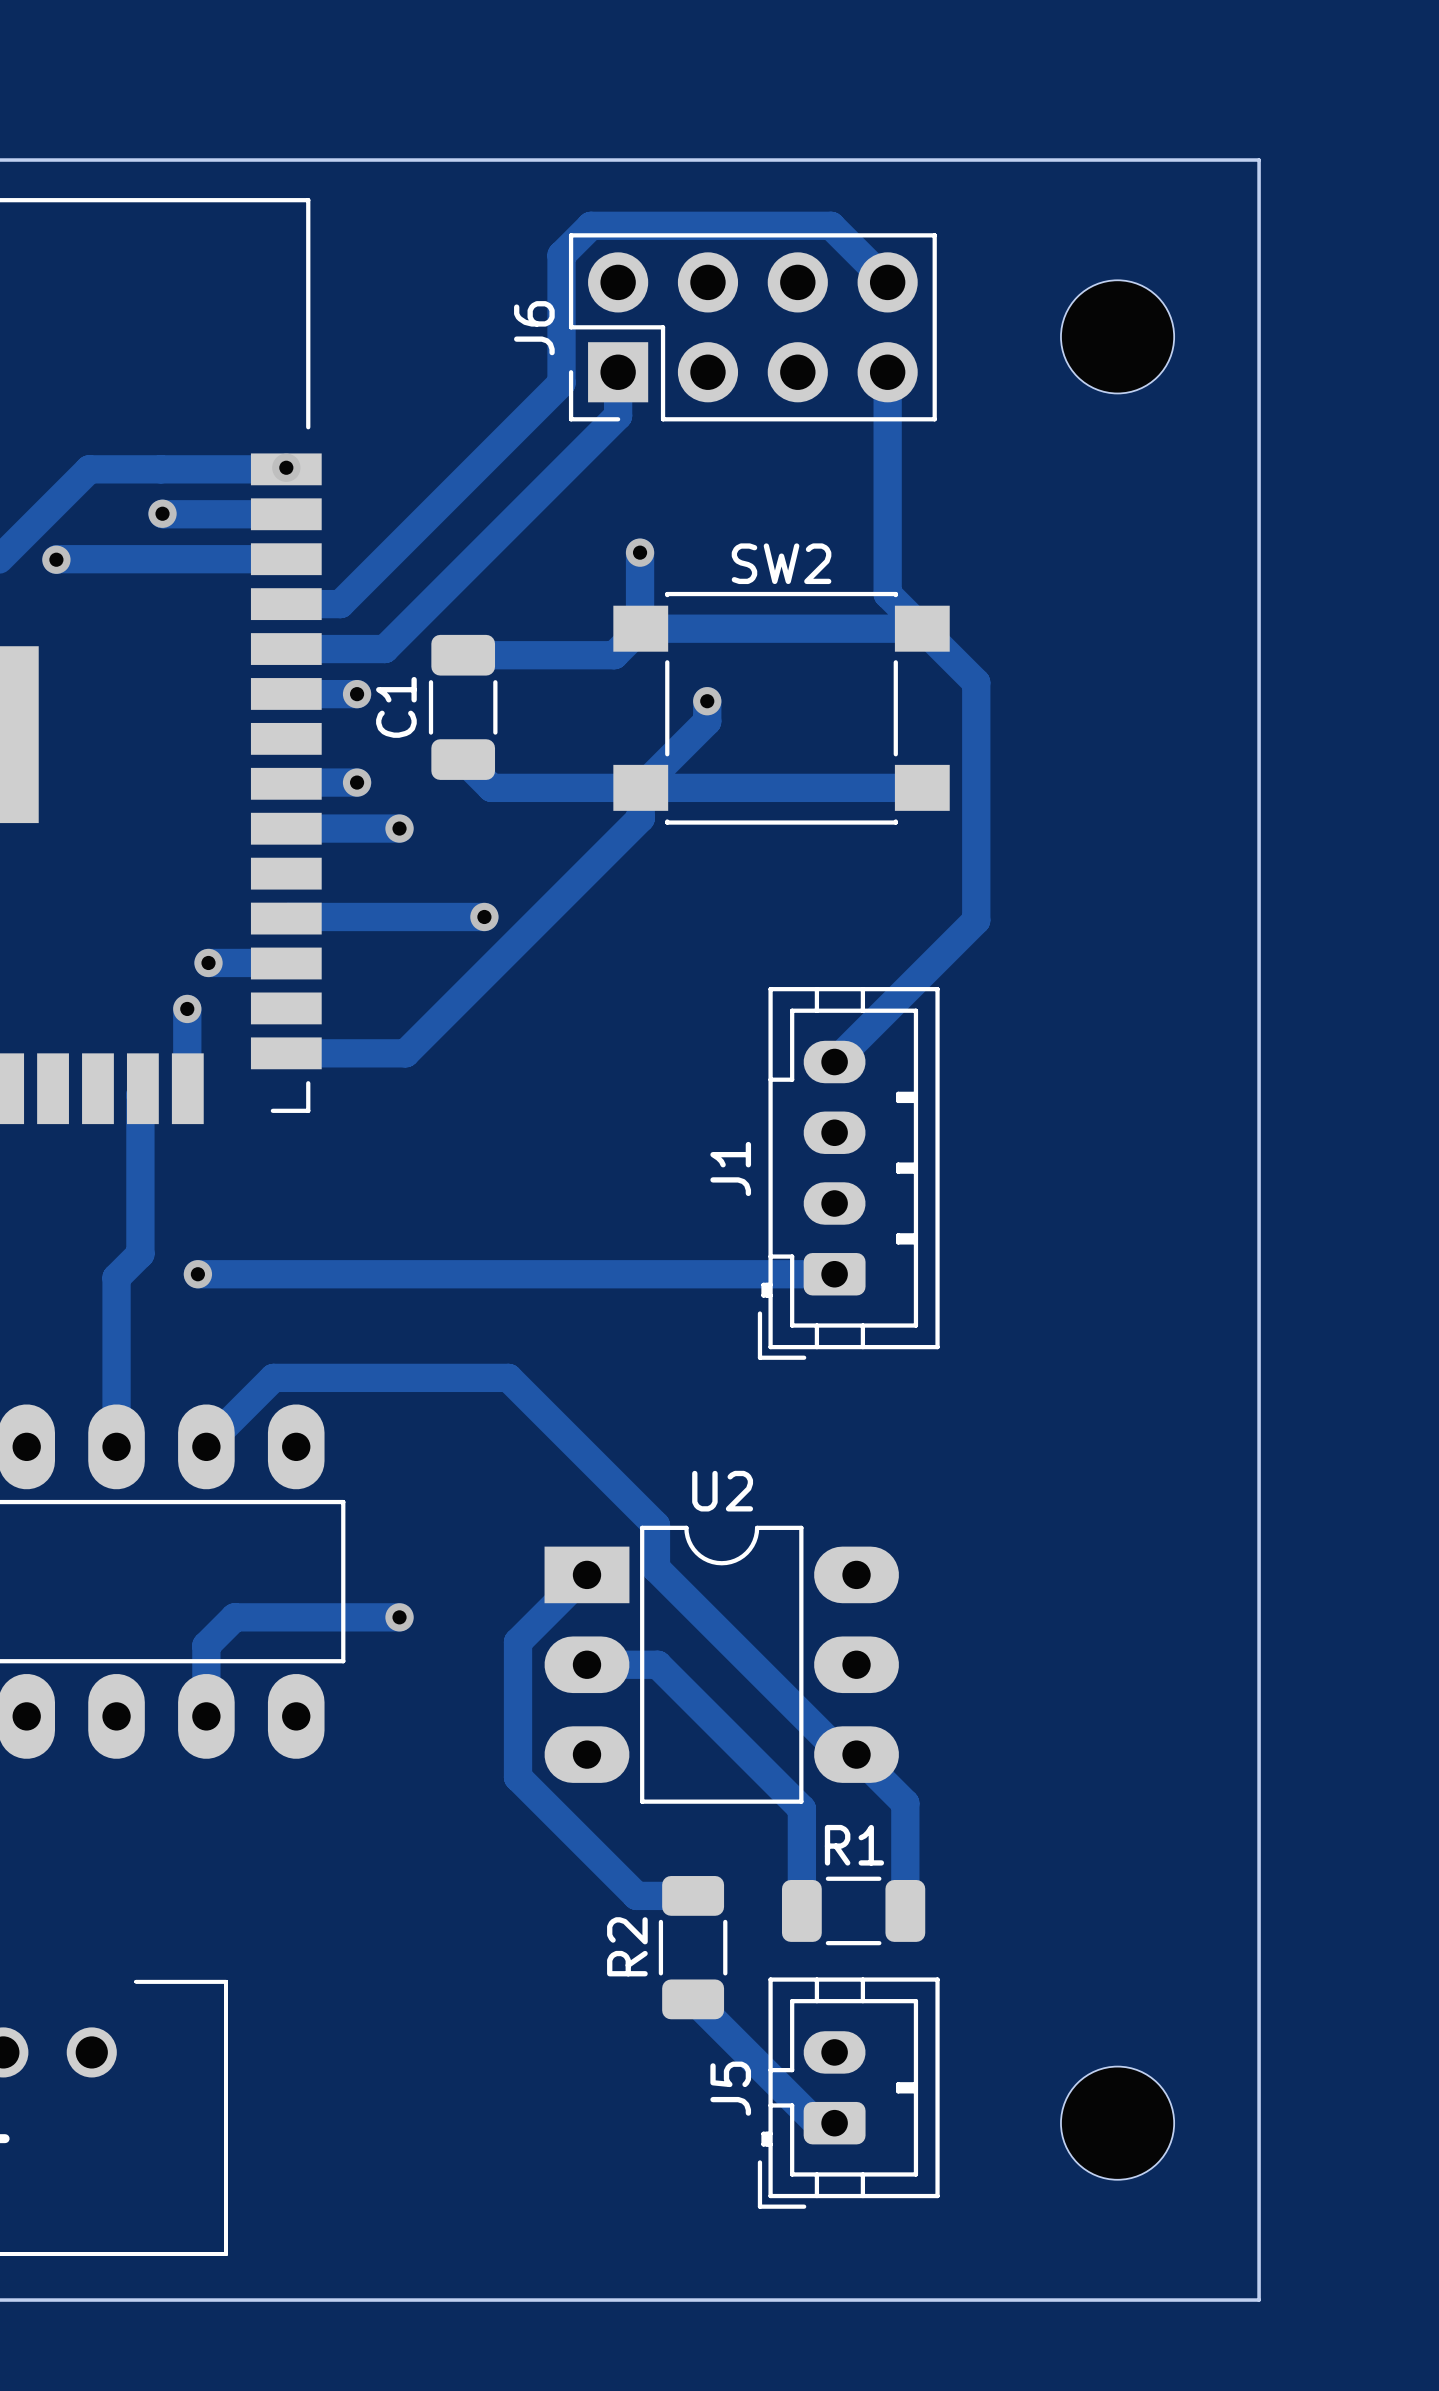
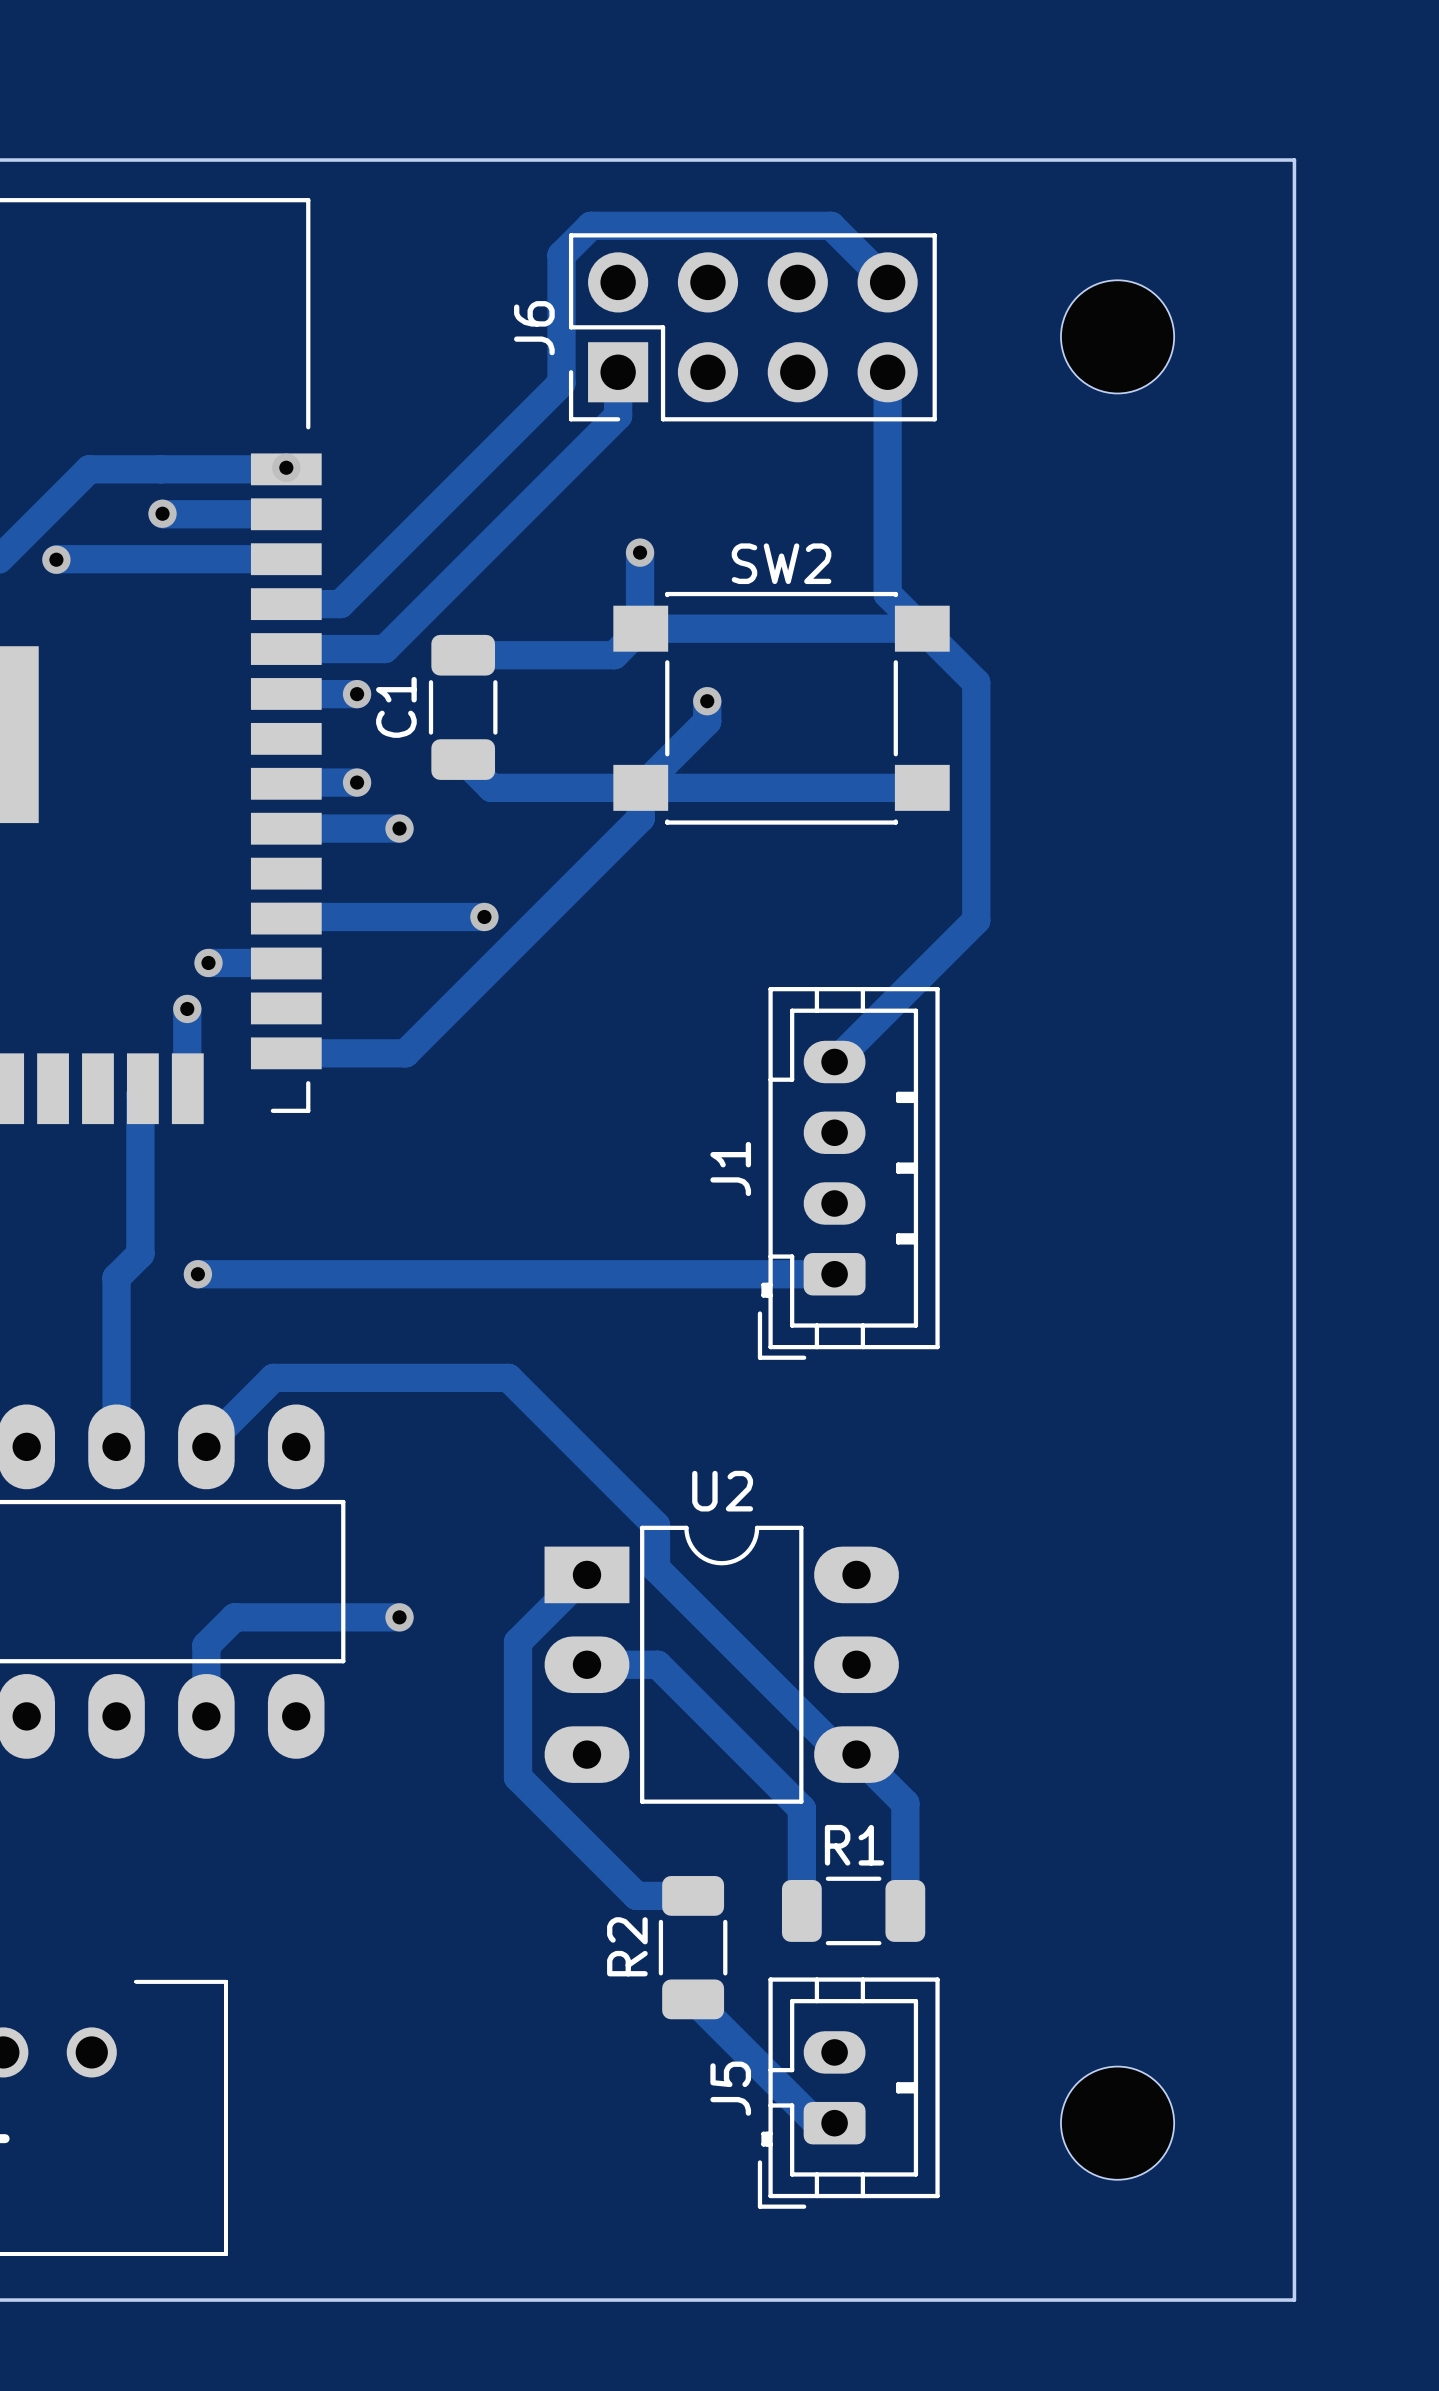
board edge: (1259, 160) (1259, 2300) -> (1259, 160) (1294, 160) (1294, 2300) (1259, 2300)

